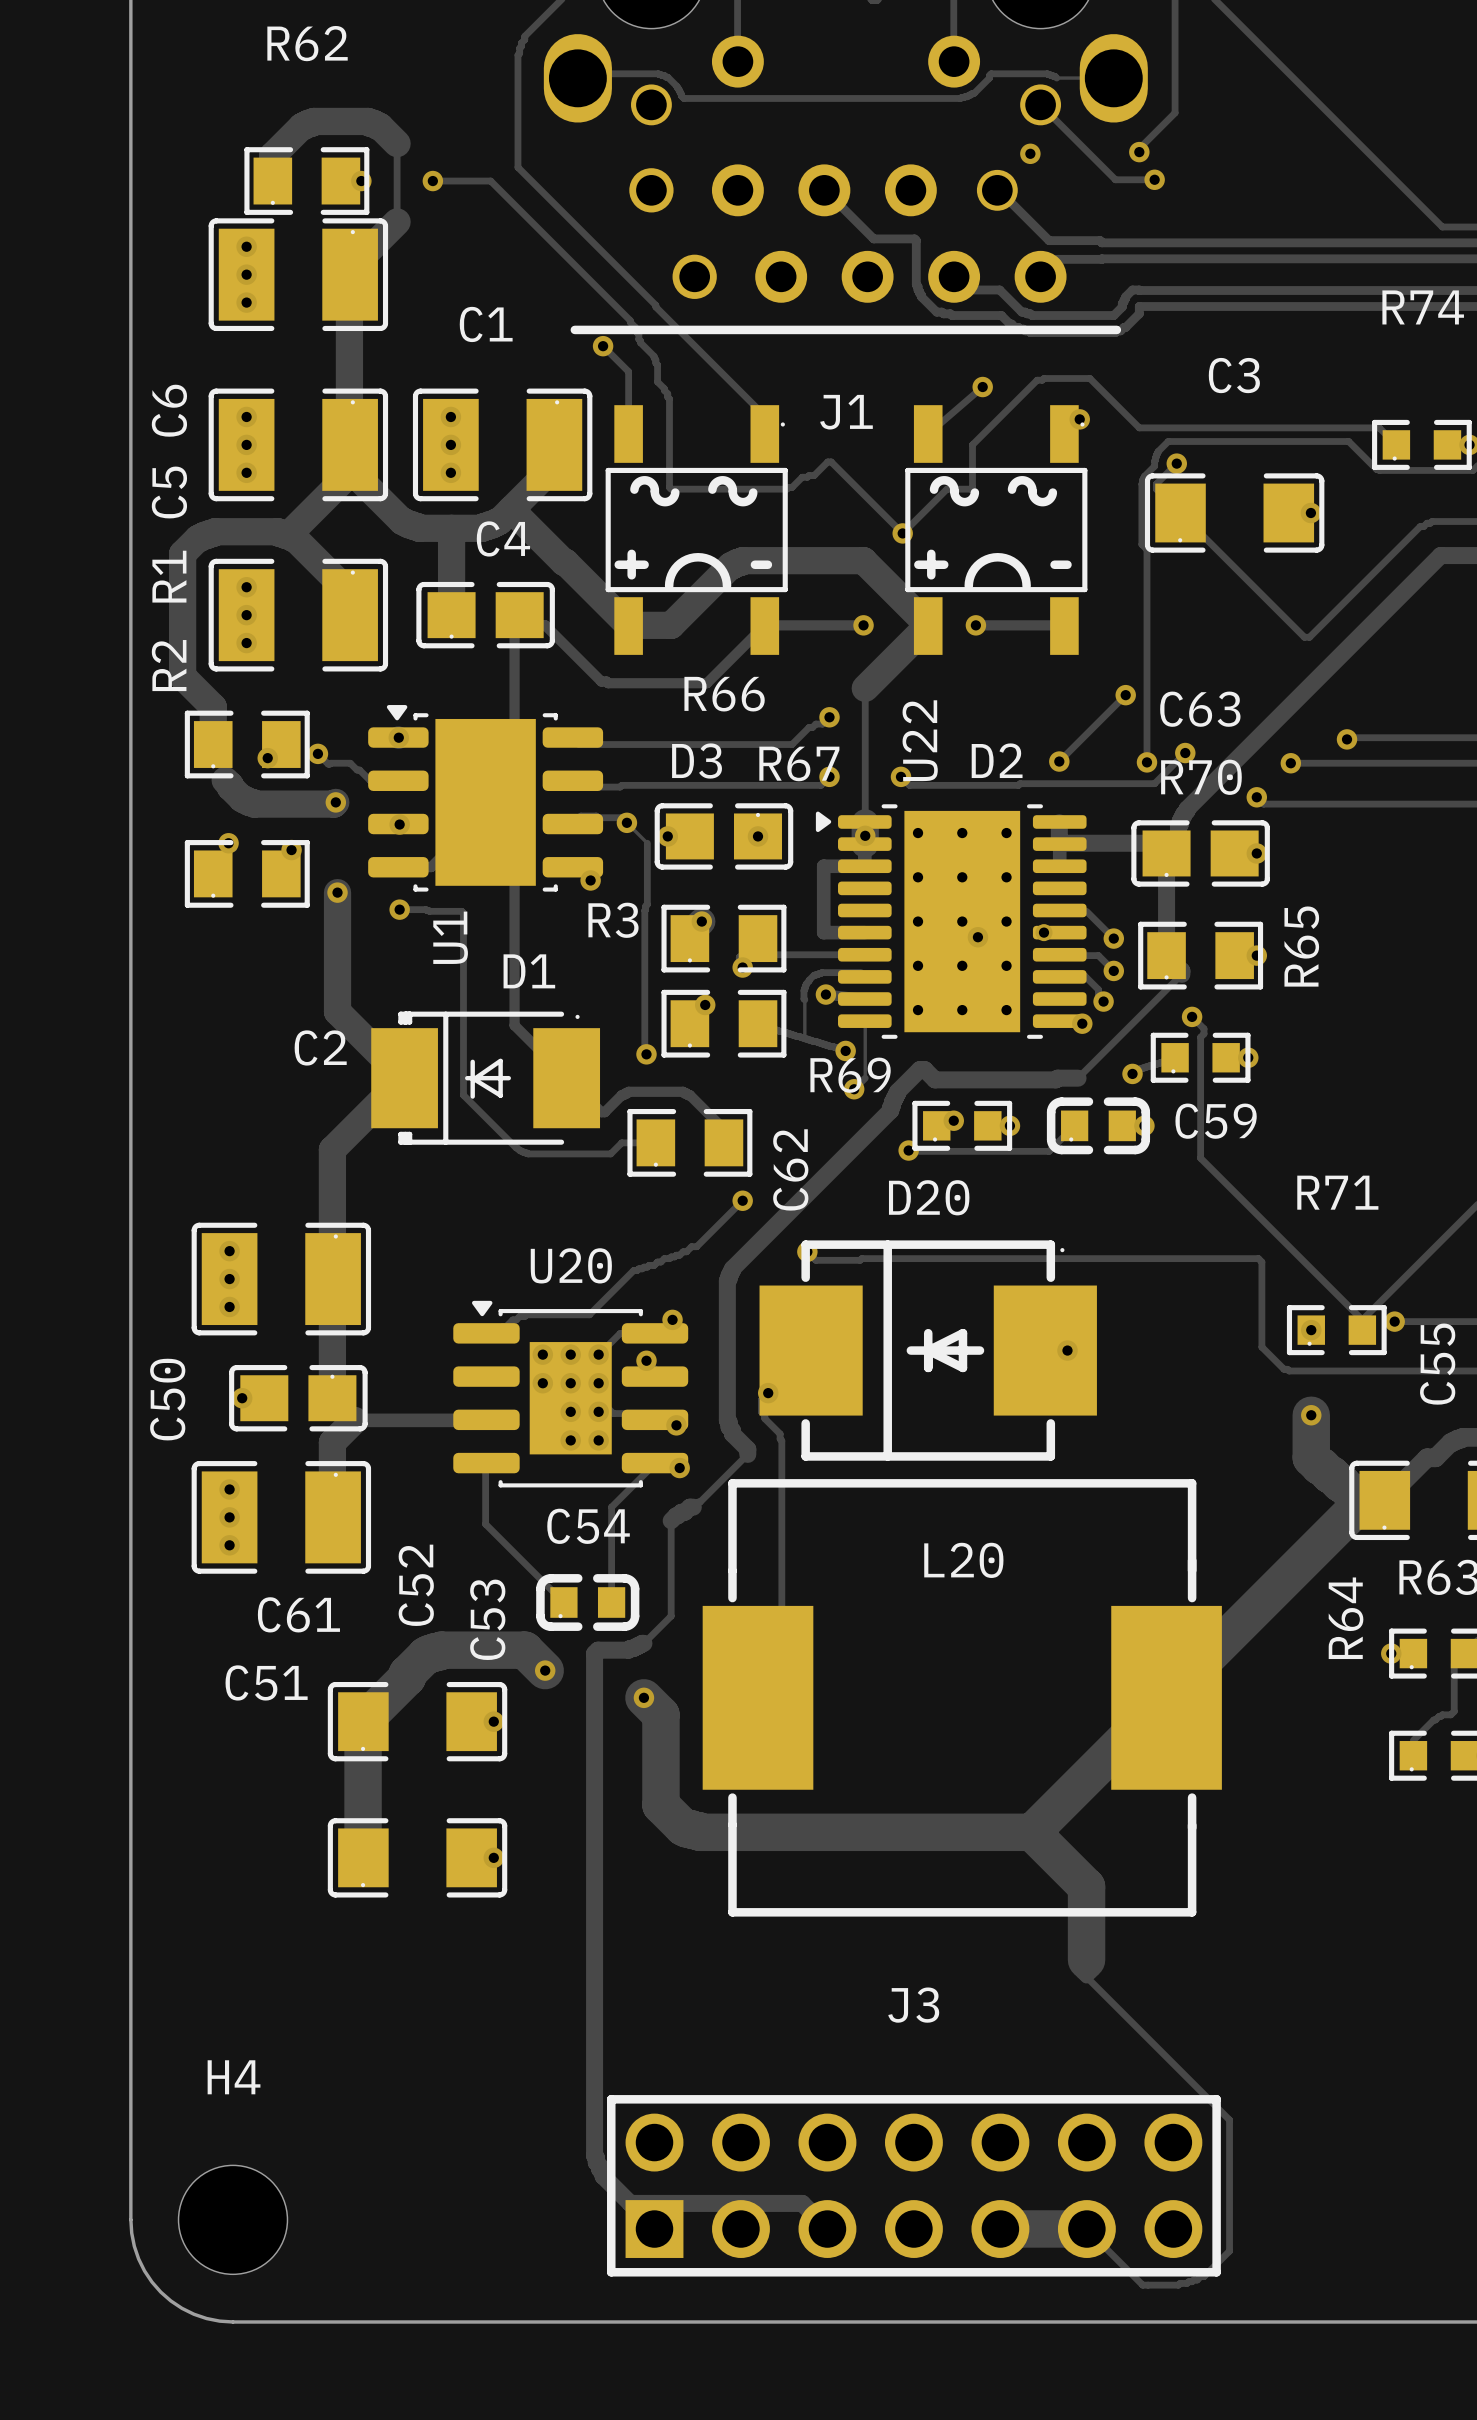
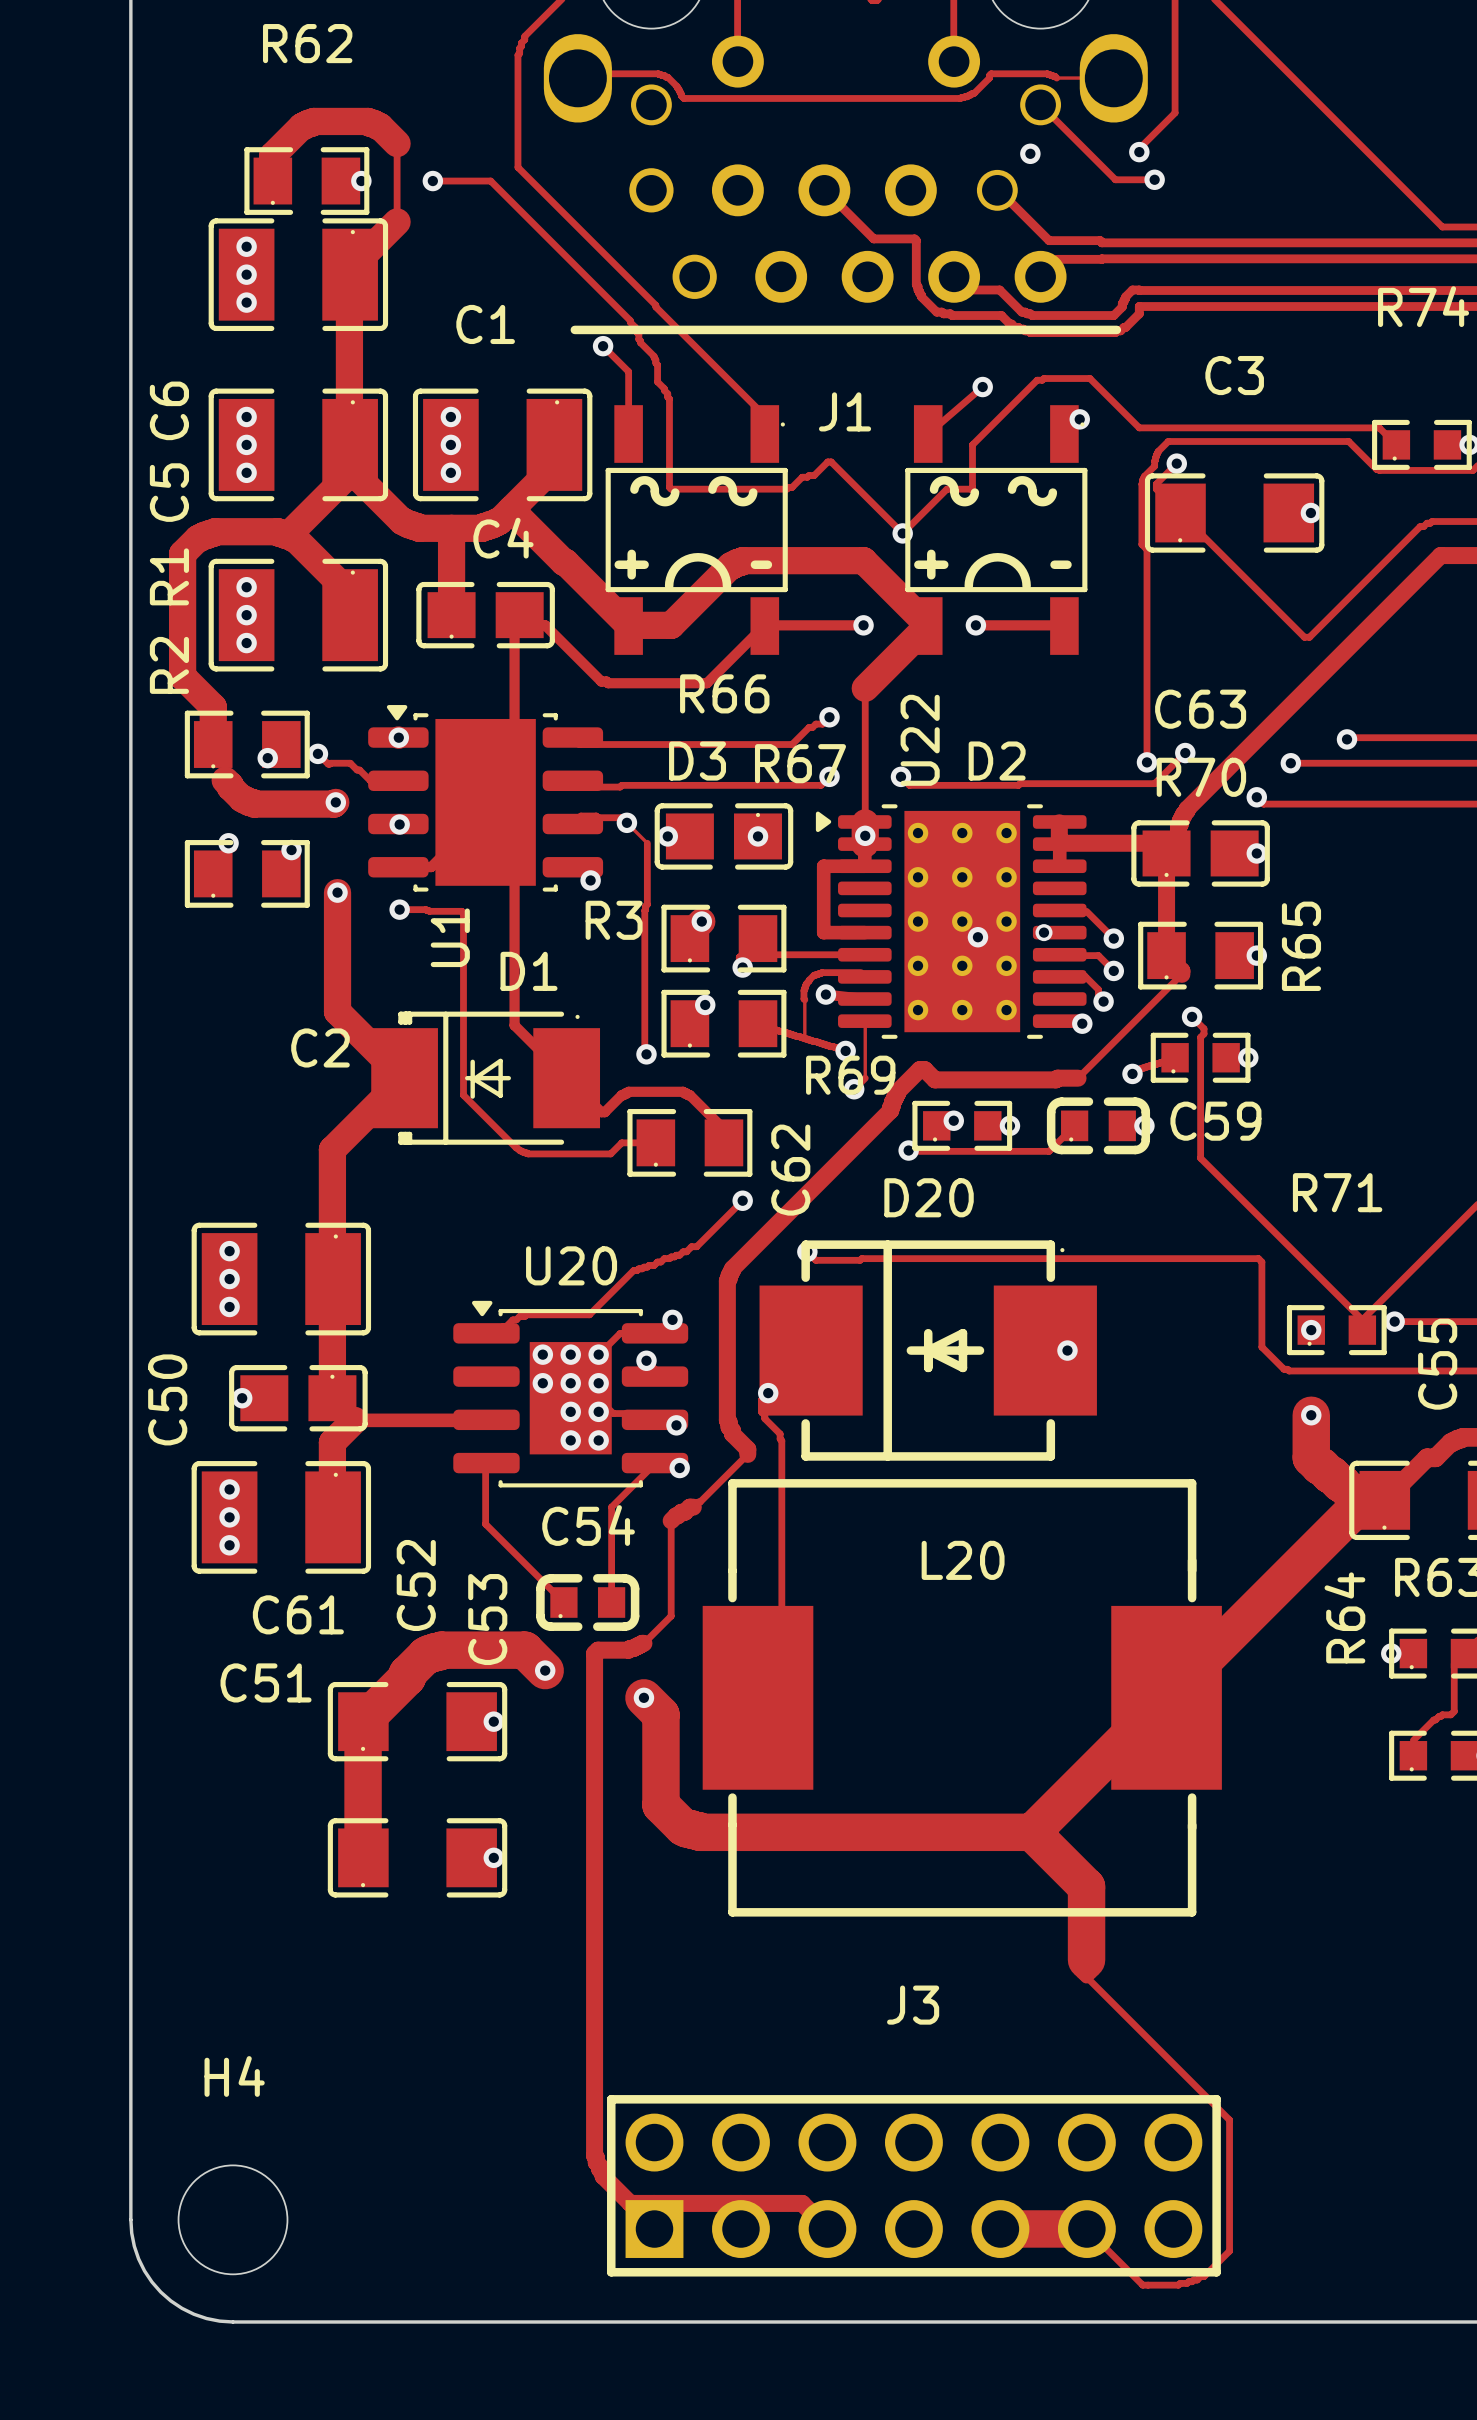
track: (1125, 695) (1059, 761) -> none
via: (1125, 695) -> none
via: (1059, 761) -> none

